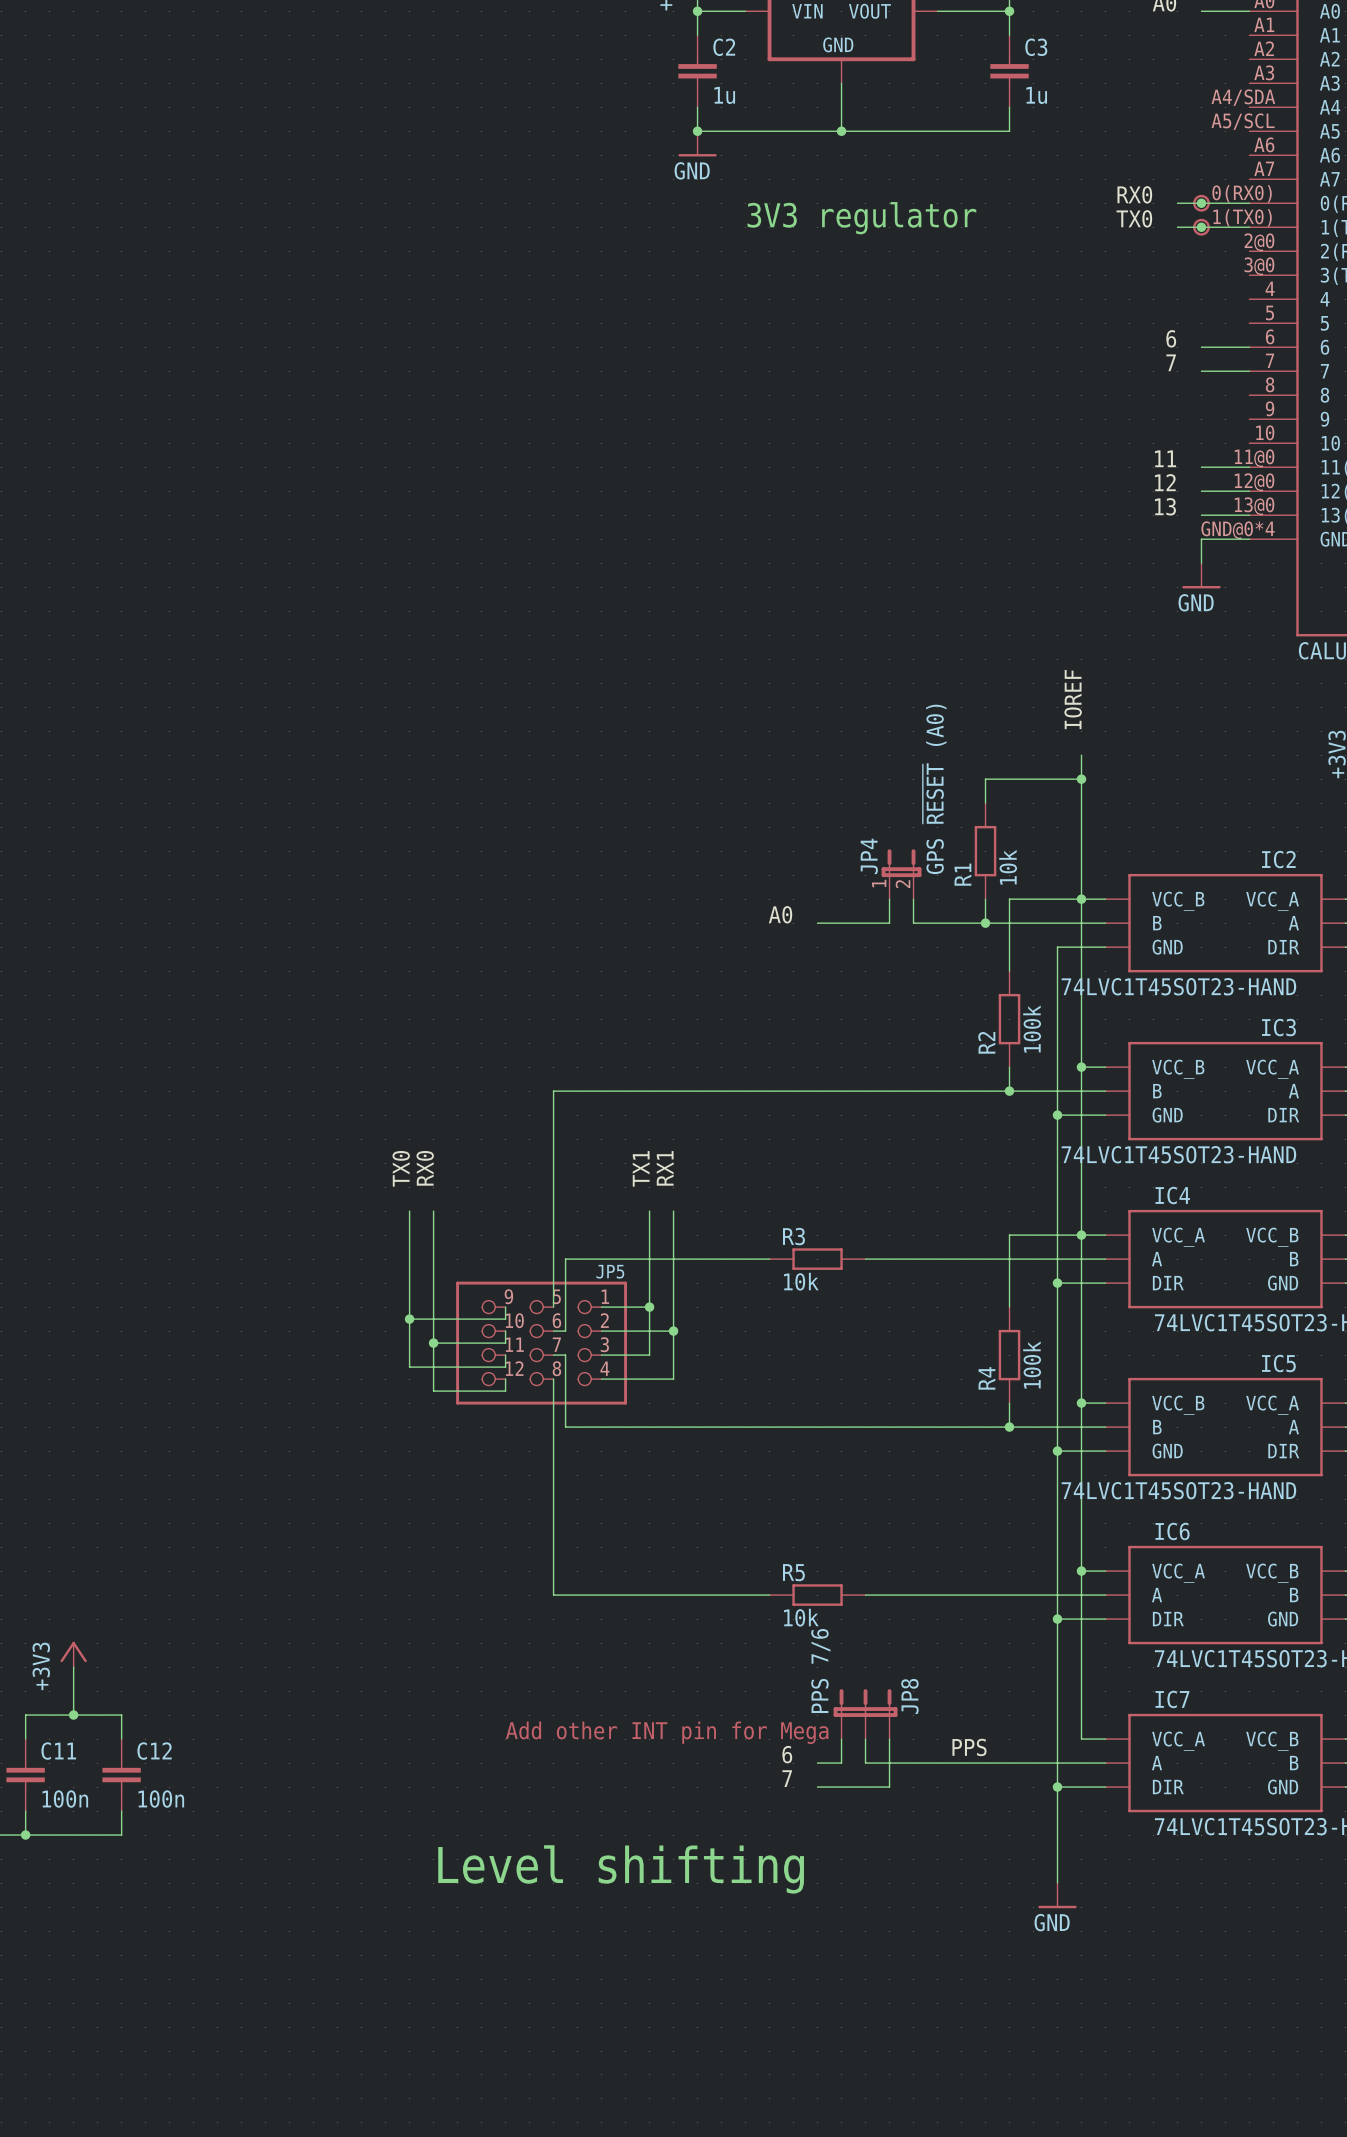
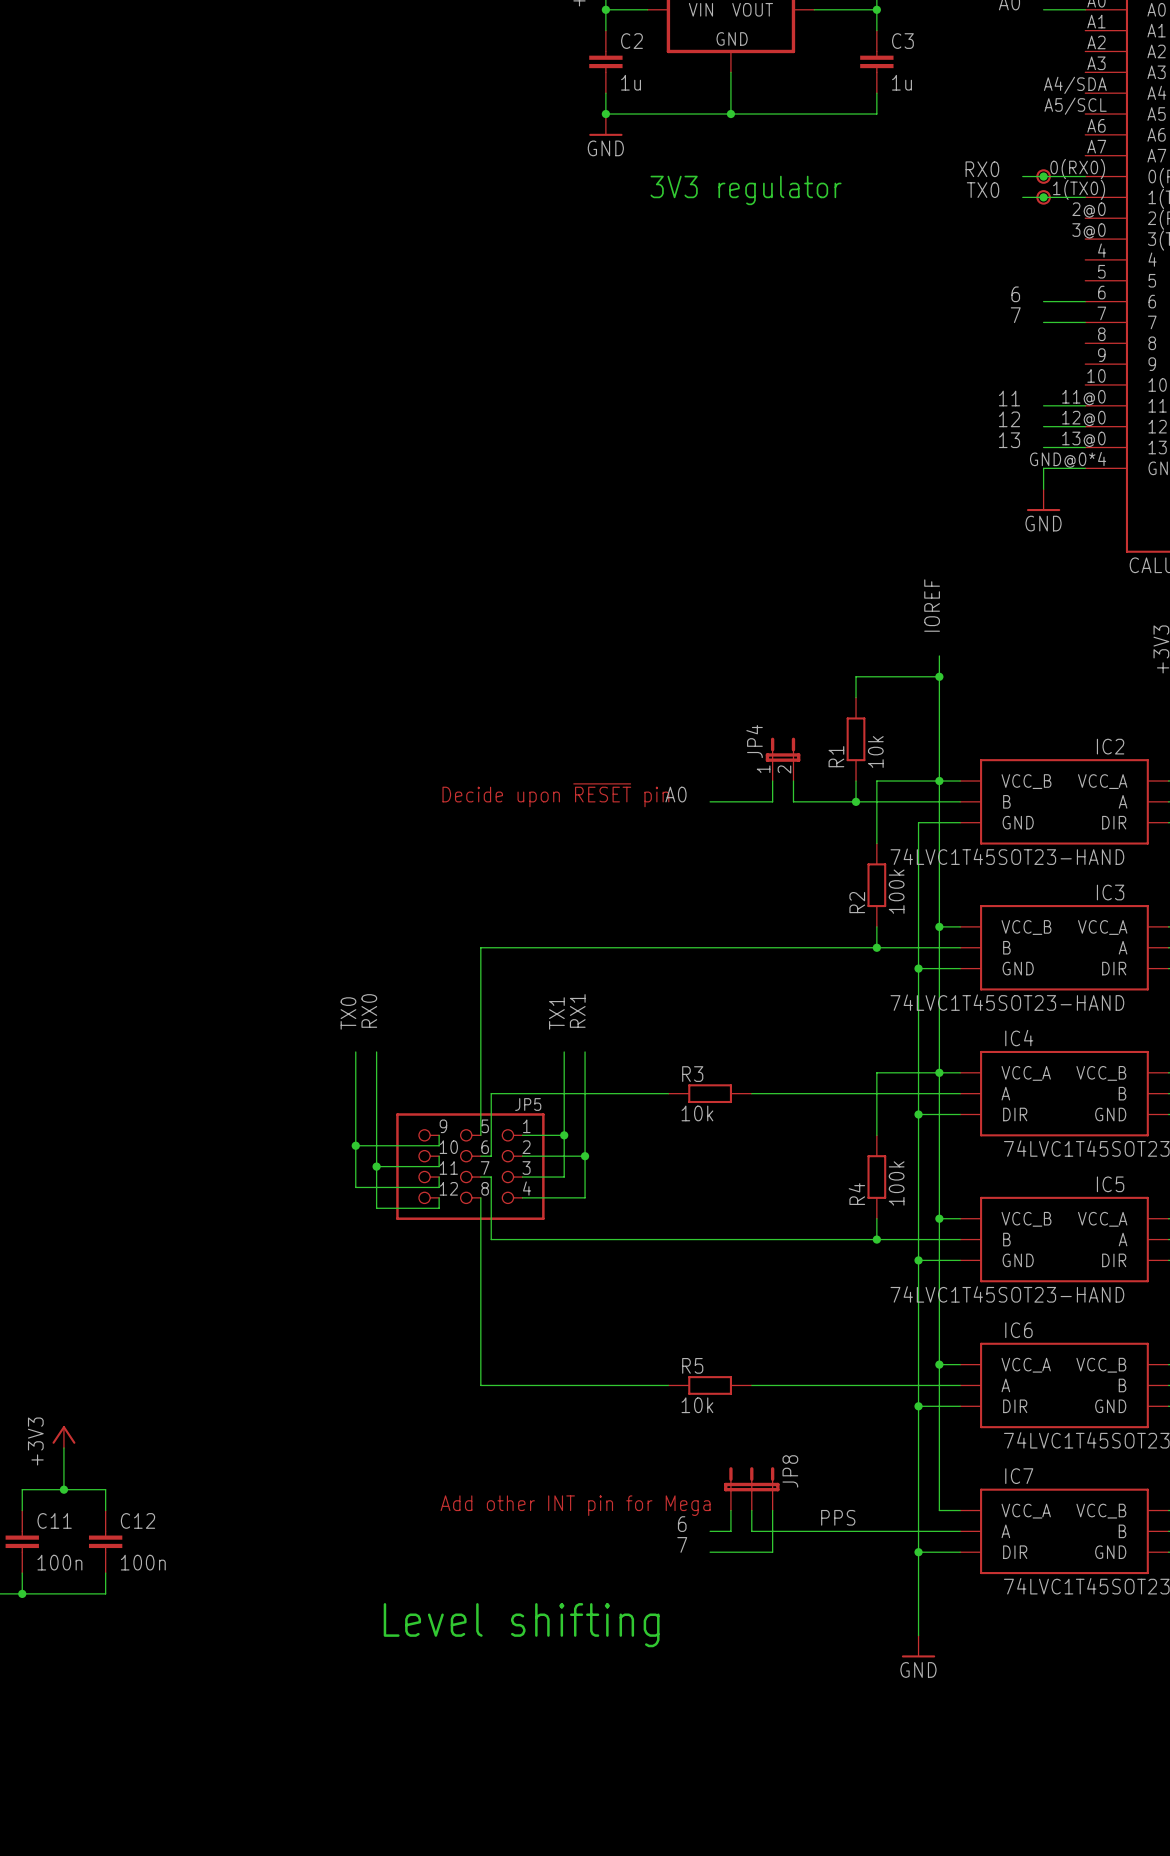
JP4 value: GPS ~{RESET} (A0) (934, 789) -> none
text: none -> Decide upon ~{RESET} pin (555, 795)
JP8 value: PPS 7/6 (820, 1671) -> none

